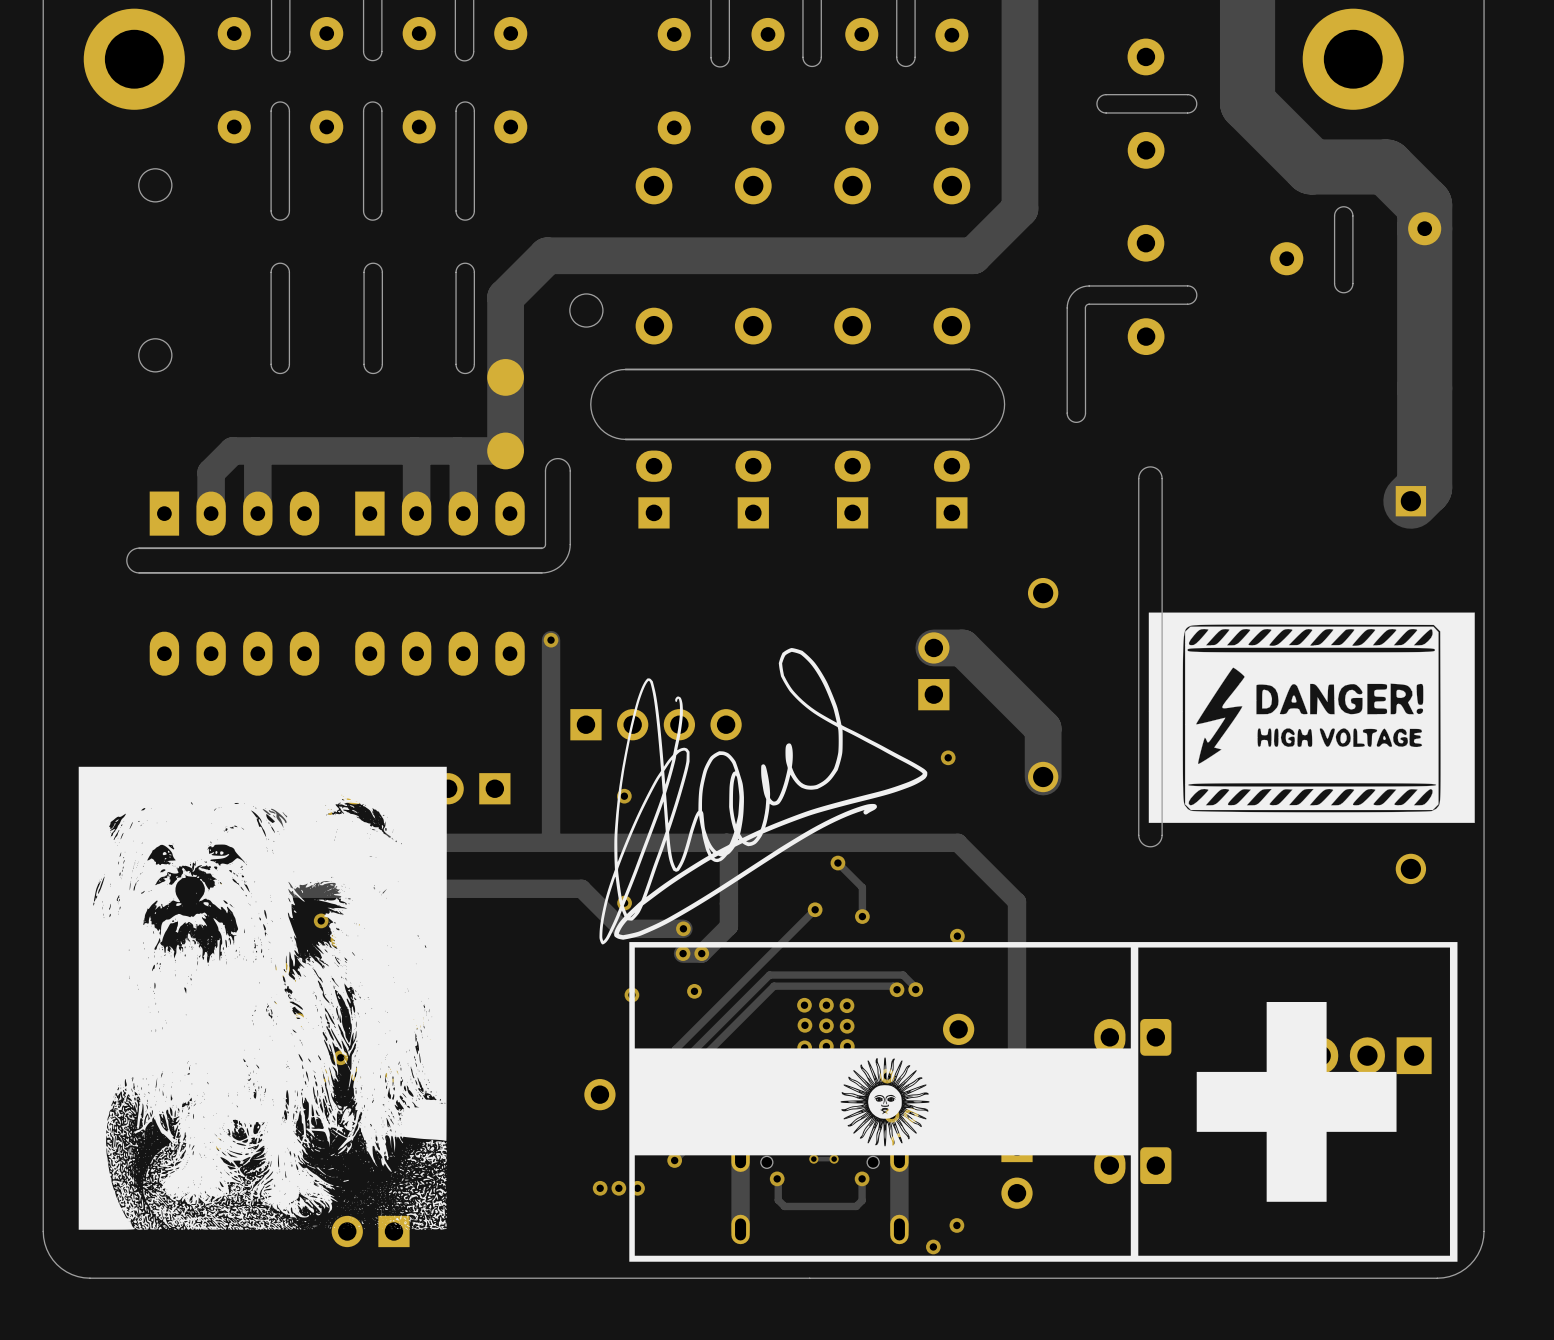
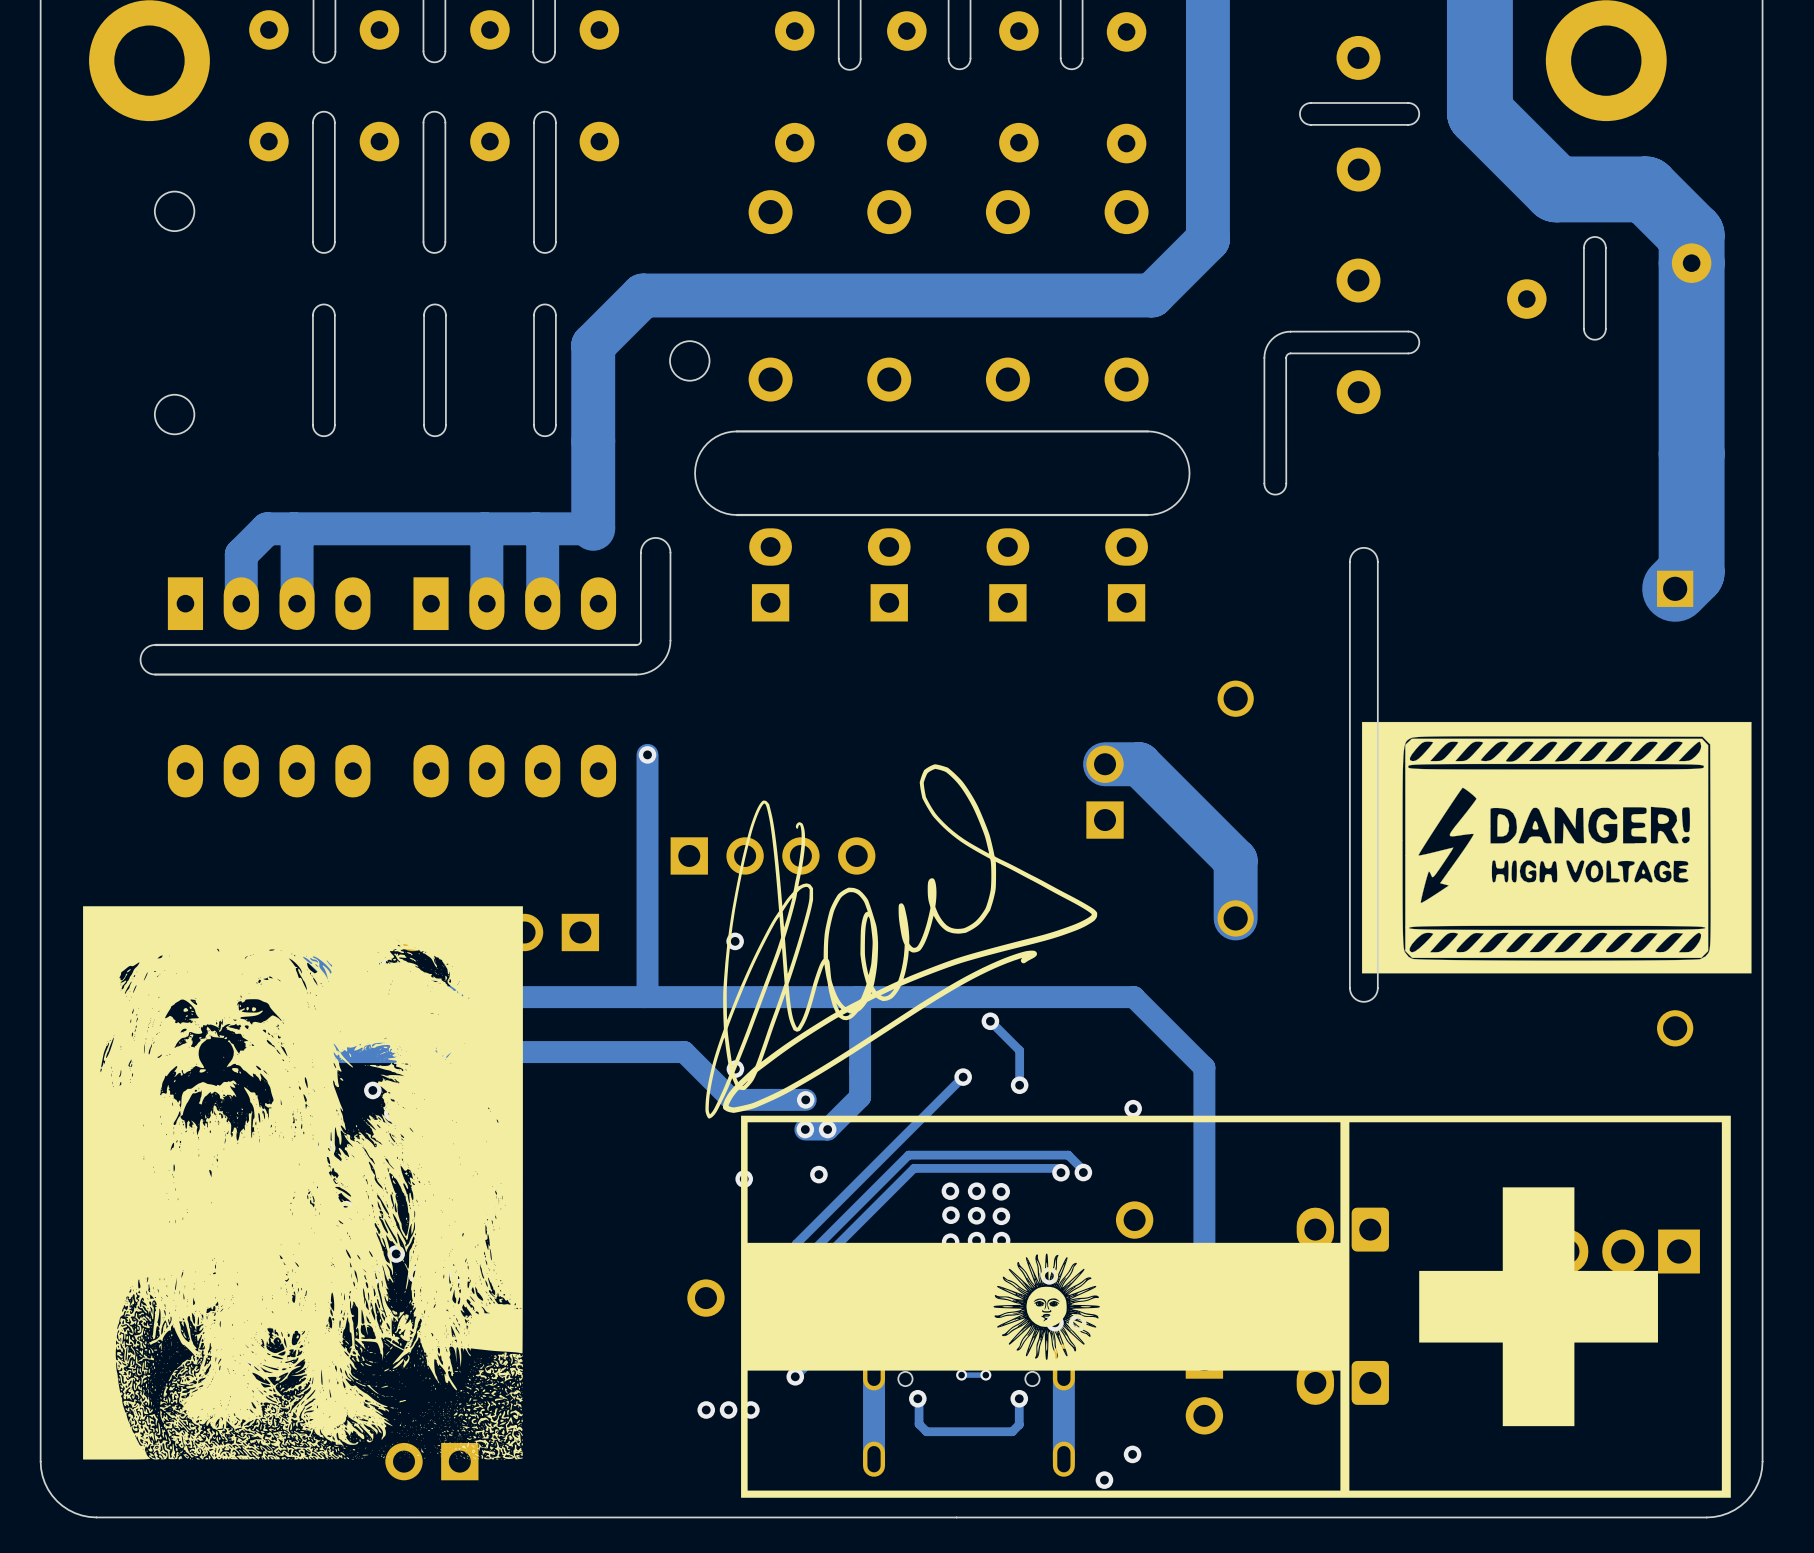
via: (948, 757) -> none

